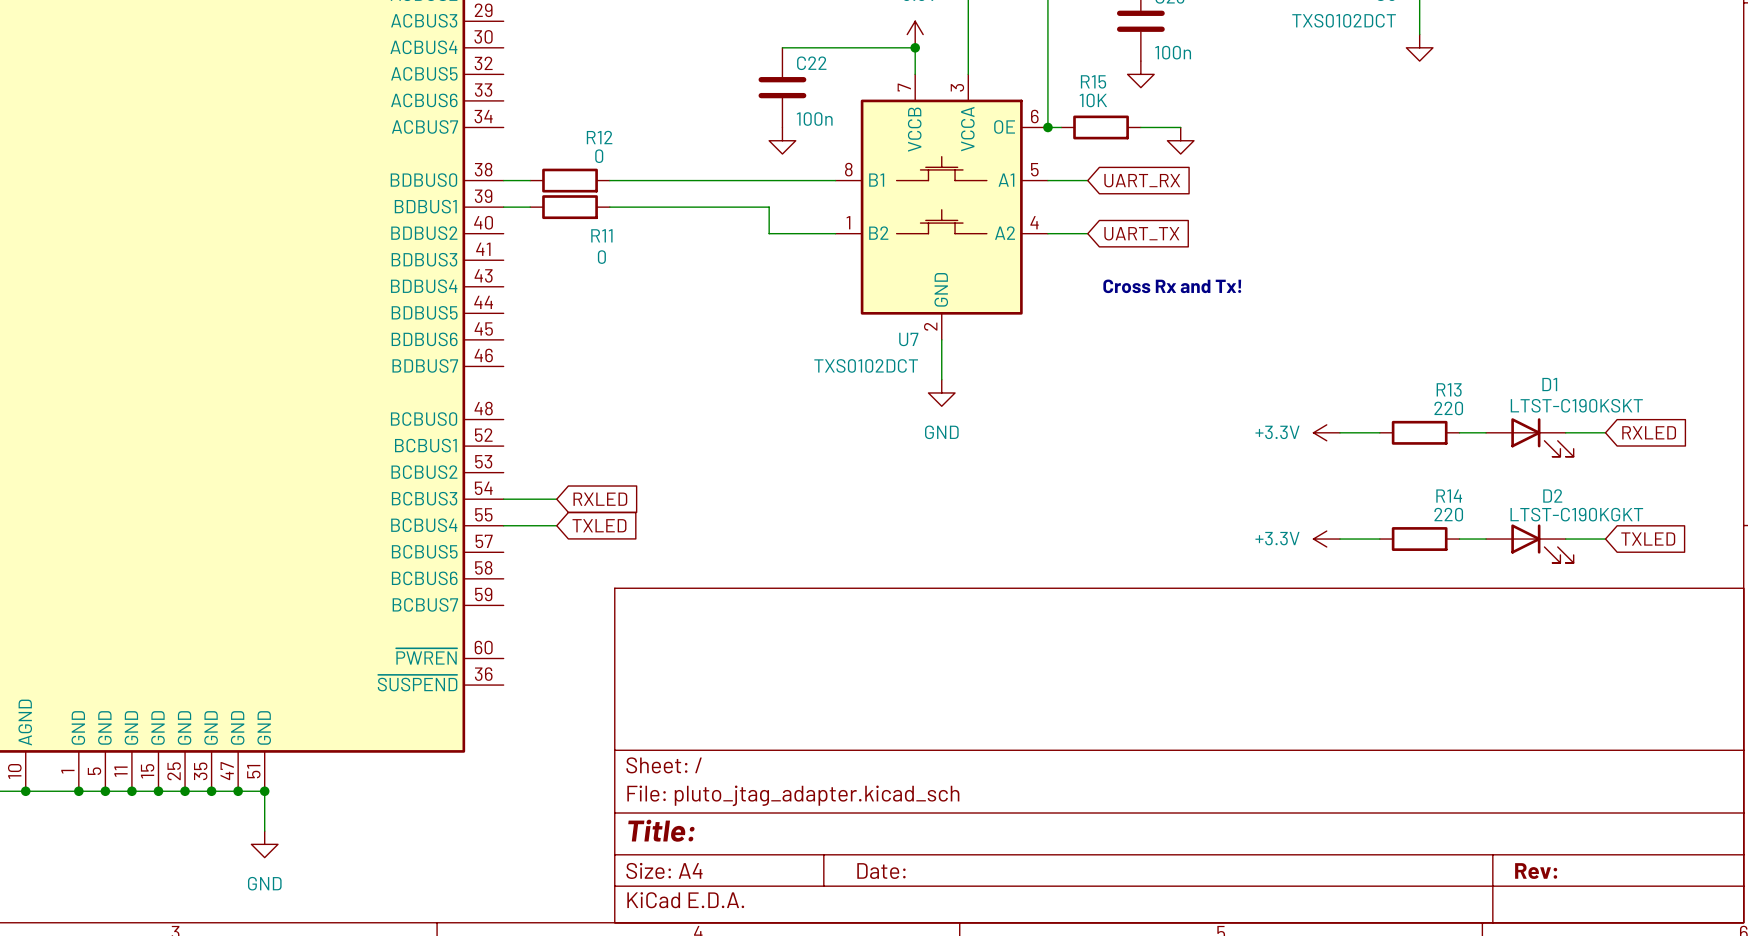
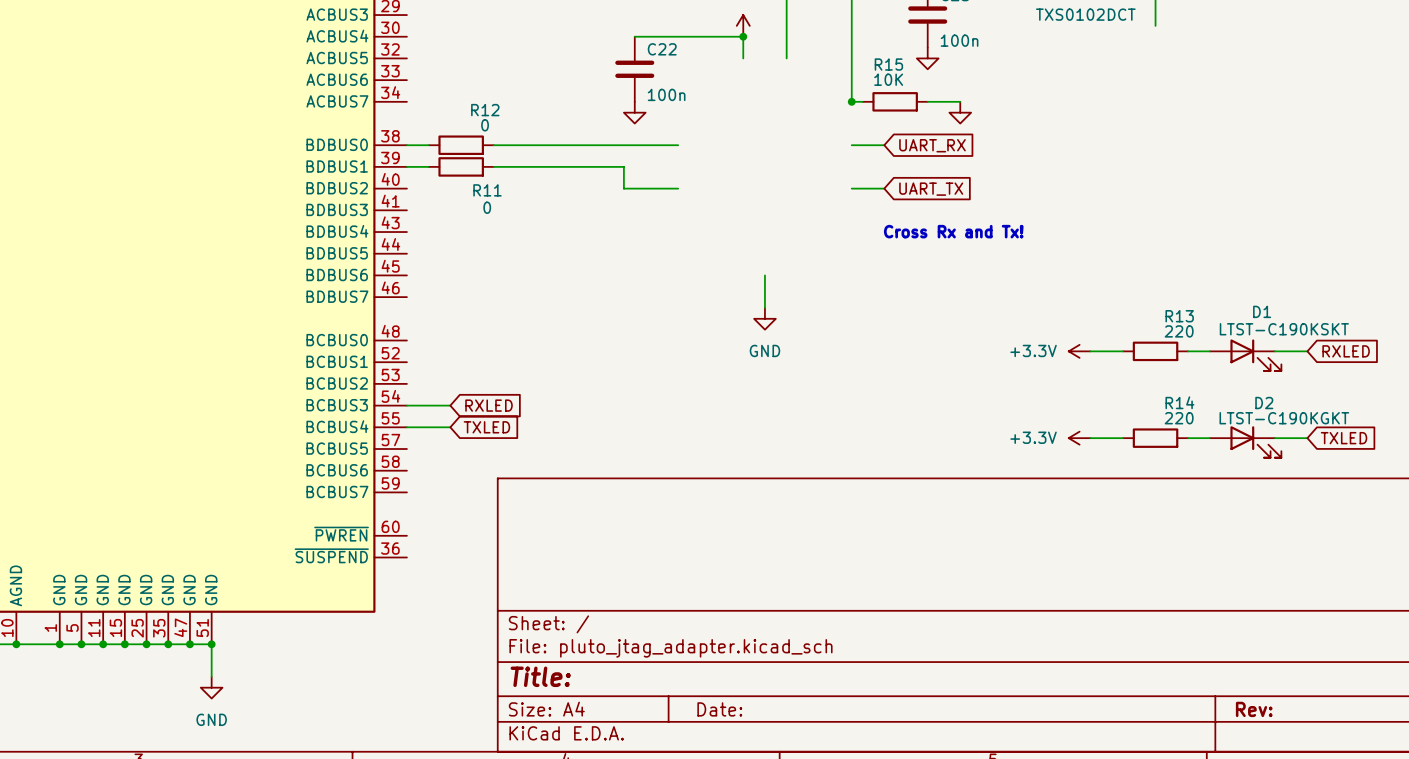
power symbol: (1419, 47) -> none
U7: TXS0102DCT (941, 207) -> none

